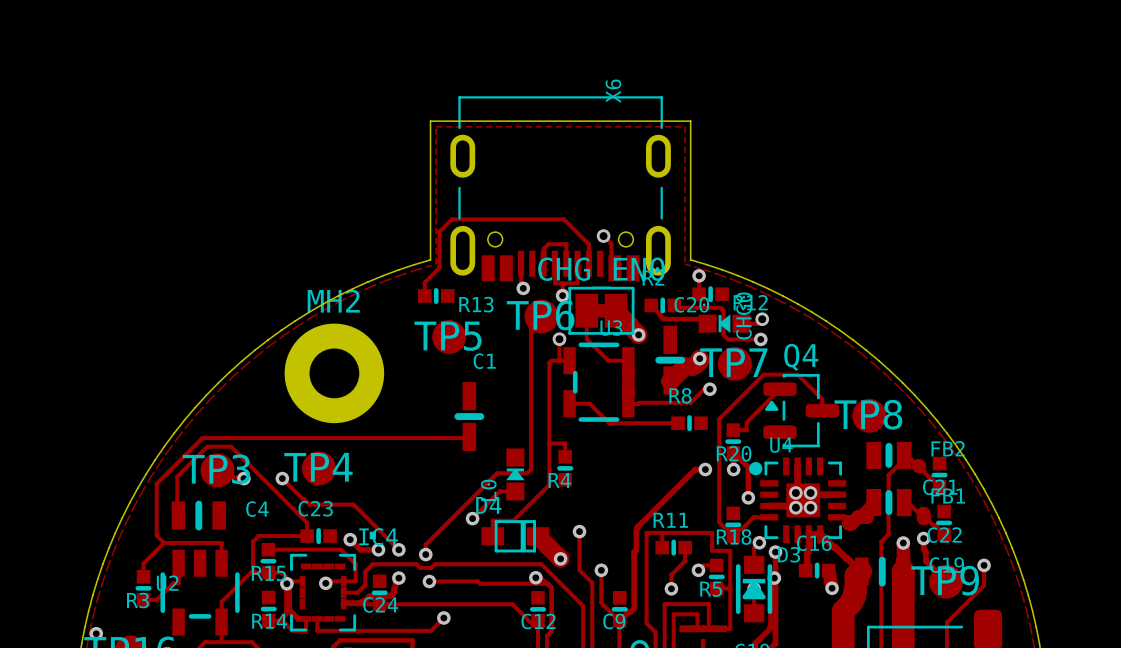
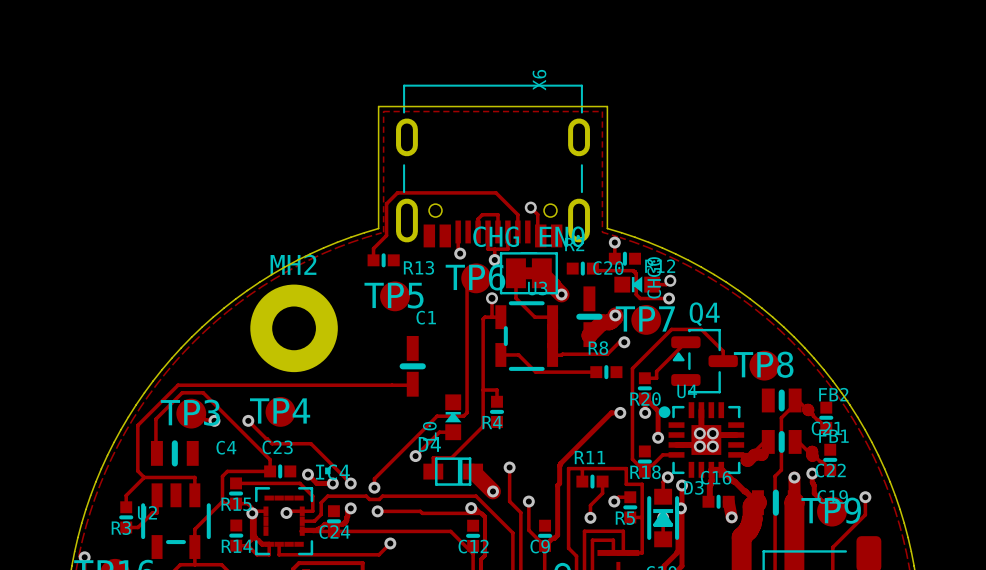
track: (651, 305) (663, 319) (703, 319) (707, 323) -> none

